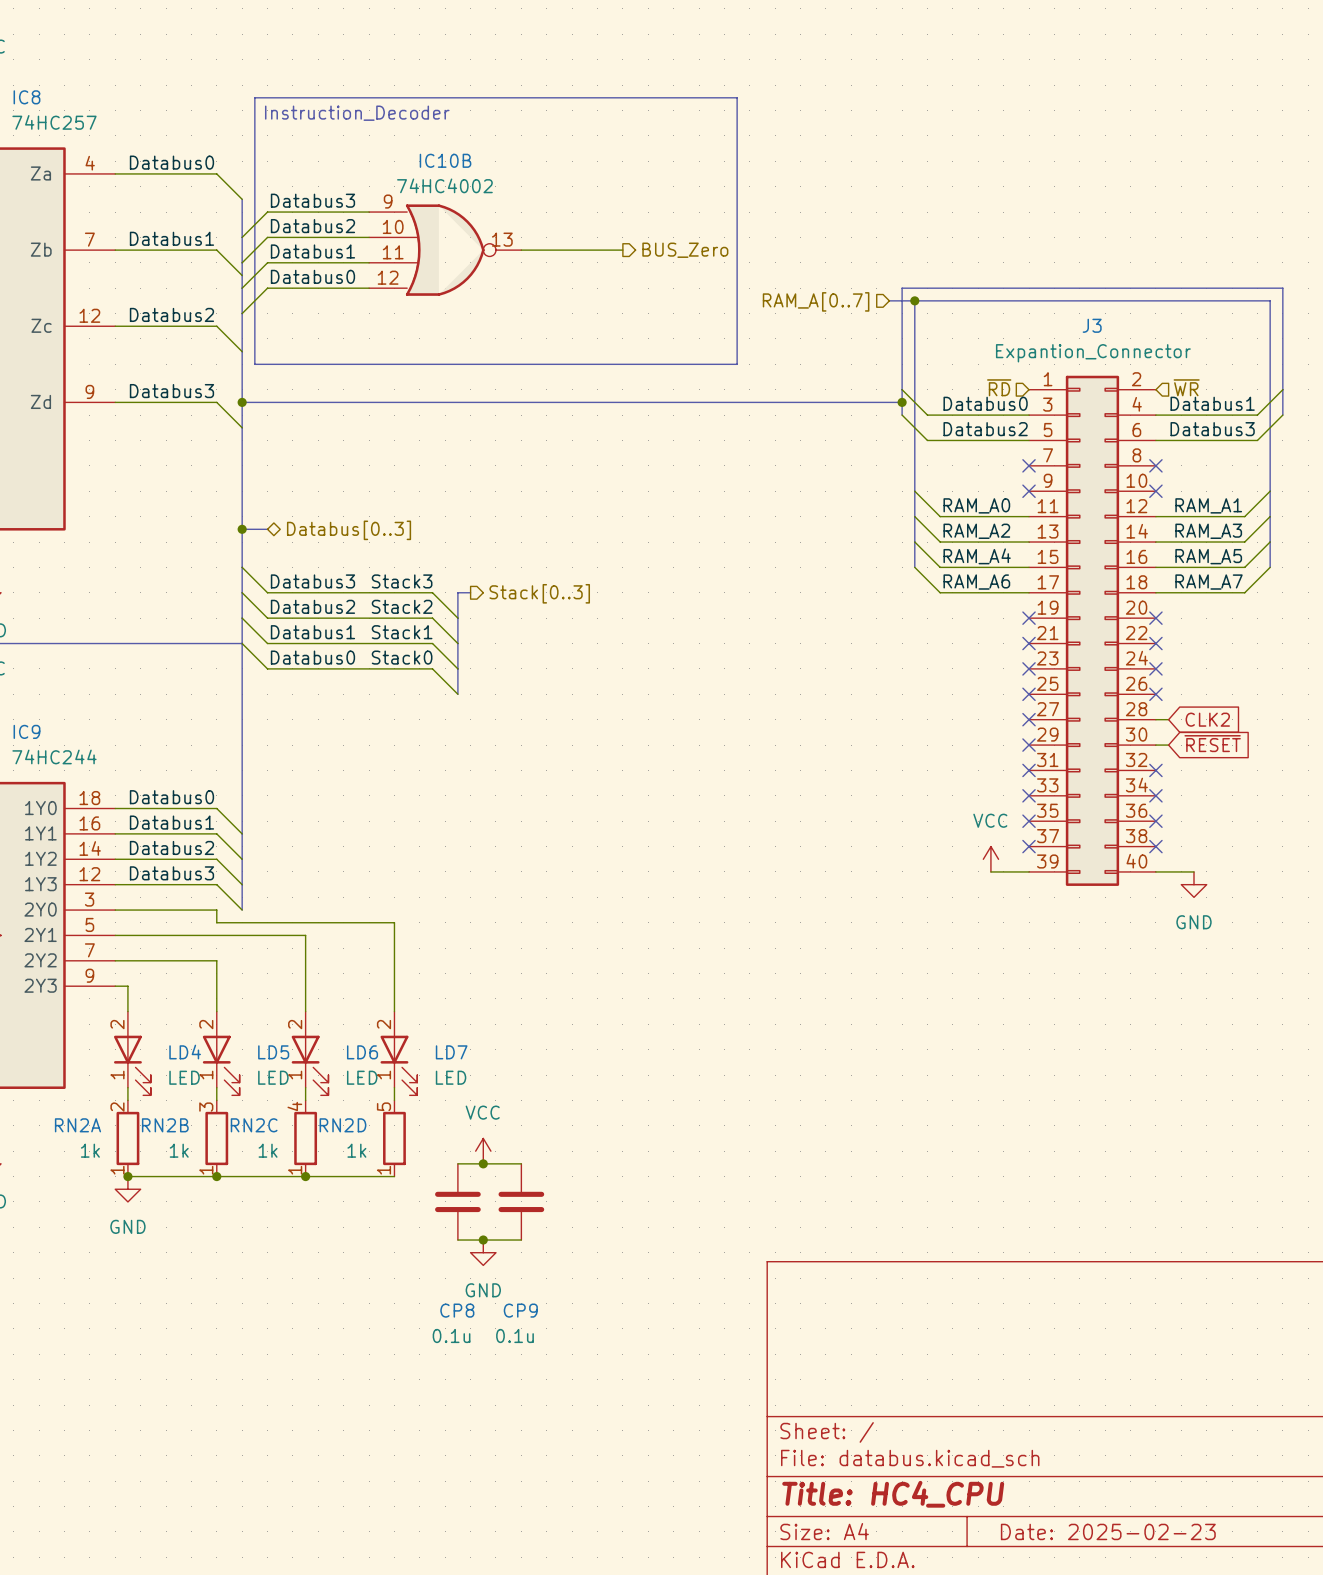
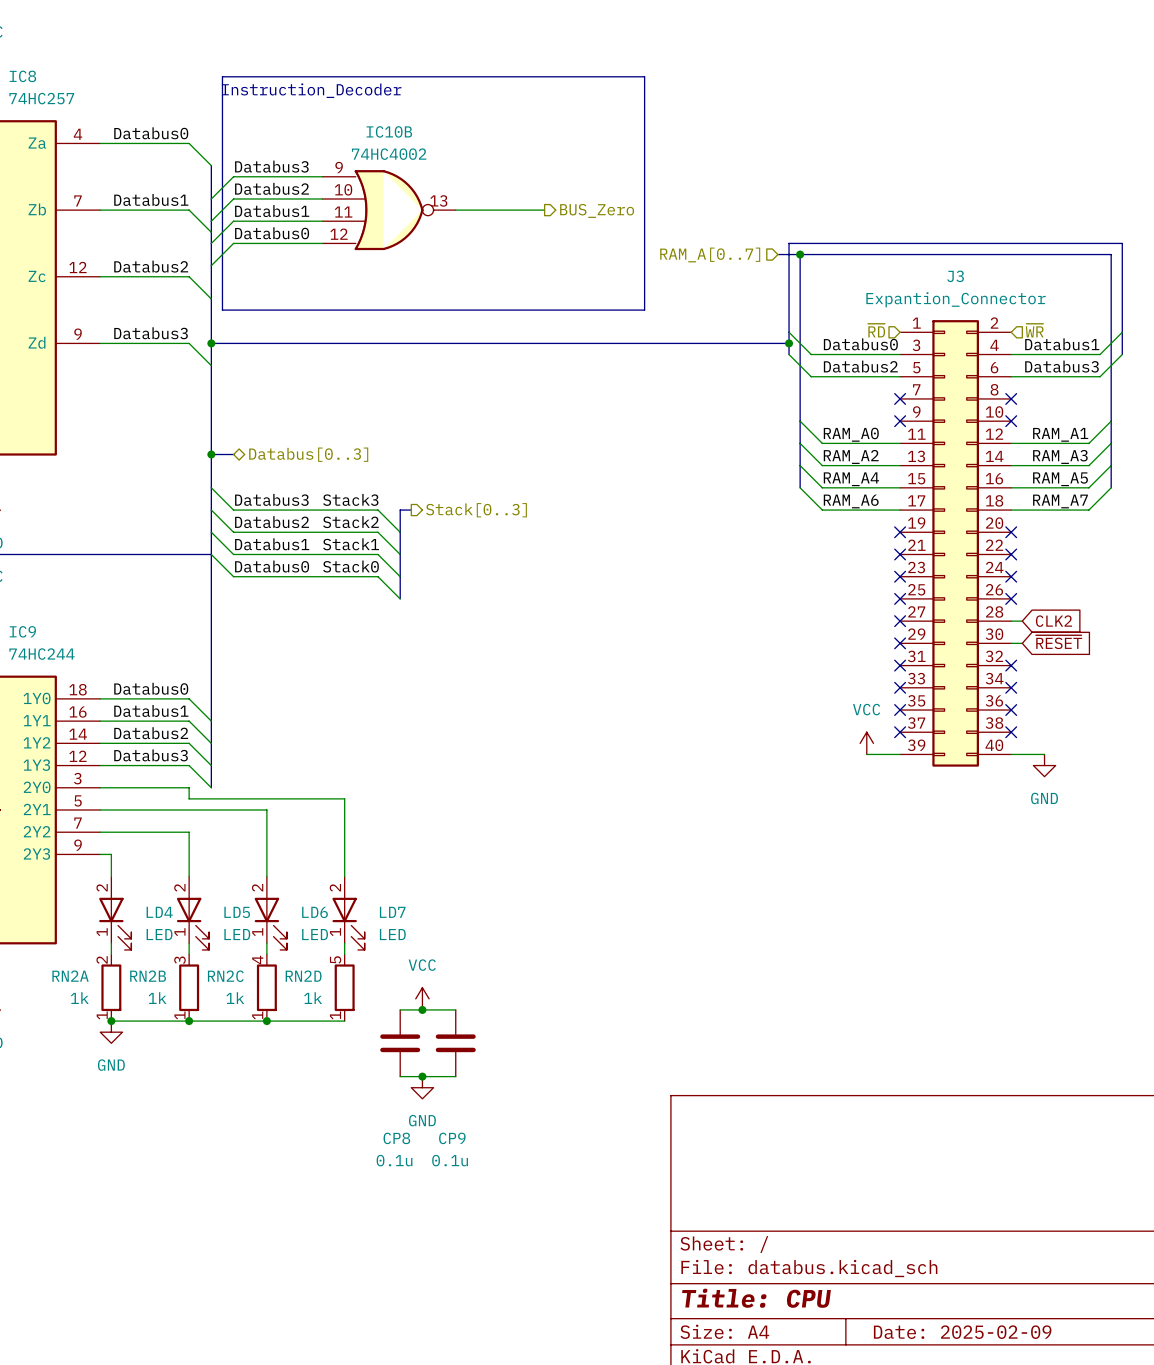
title block: Title: HC4_CPU (893, 1494) -> Title: CPU (756, 1298)
title block: Date: 2025-02-23 (1108, 1531) -> Date: 2025-02-09 (962, 1332)

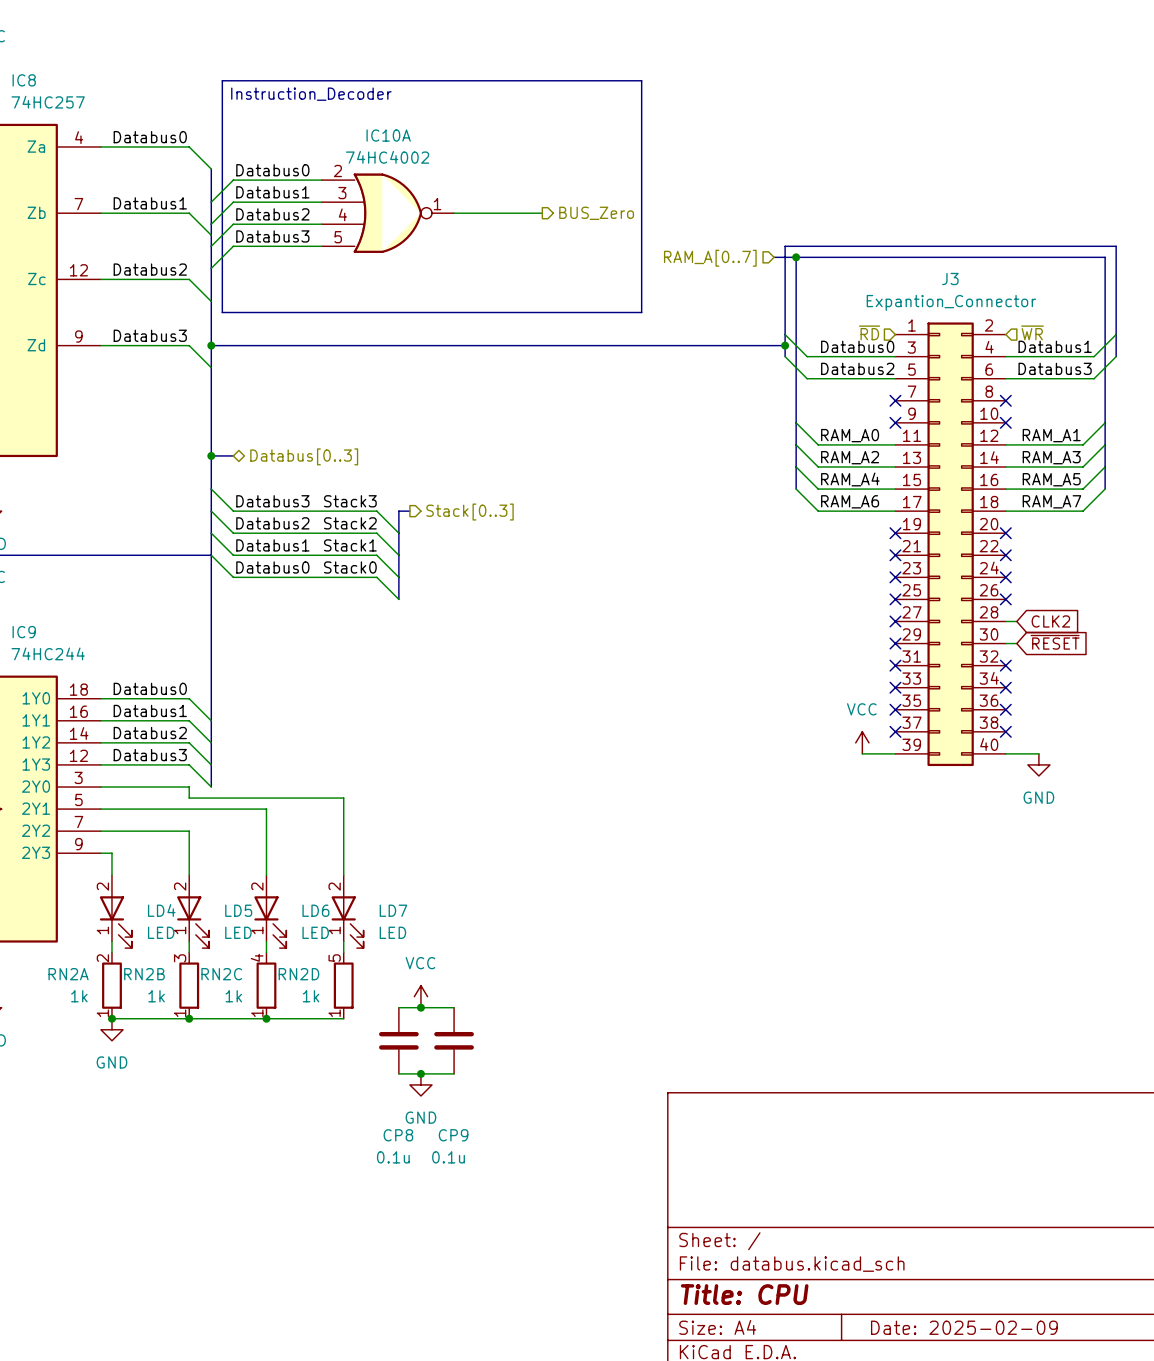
IC10B name: IC10B (389, 131) -> IC10A (388, 135)
label: Databus3 (271, 166) -> Databus0 (272, 170)
IC10B pin number: 9 (339, 167) -> 2 (337, 170)
label: Databus2 (272, 188) -> Databus1 (272, 192)
IC10B pin number: 10 (343, 189) -> 3 (342, 193)
IC10B pin number: 13 (438, 200) -> 1 (437, 204)
label: Databus1 (272, 211) -> Databus2 (272, 214)
IC10B pin number: 11 (343, 212) -> 4 (342, 214)
label: Databus0 (272, 233) -> Databus3 (272, 236)
IC10B pin number: 12 (339, 234) -> 5 (338, 237)

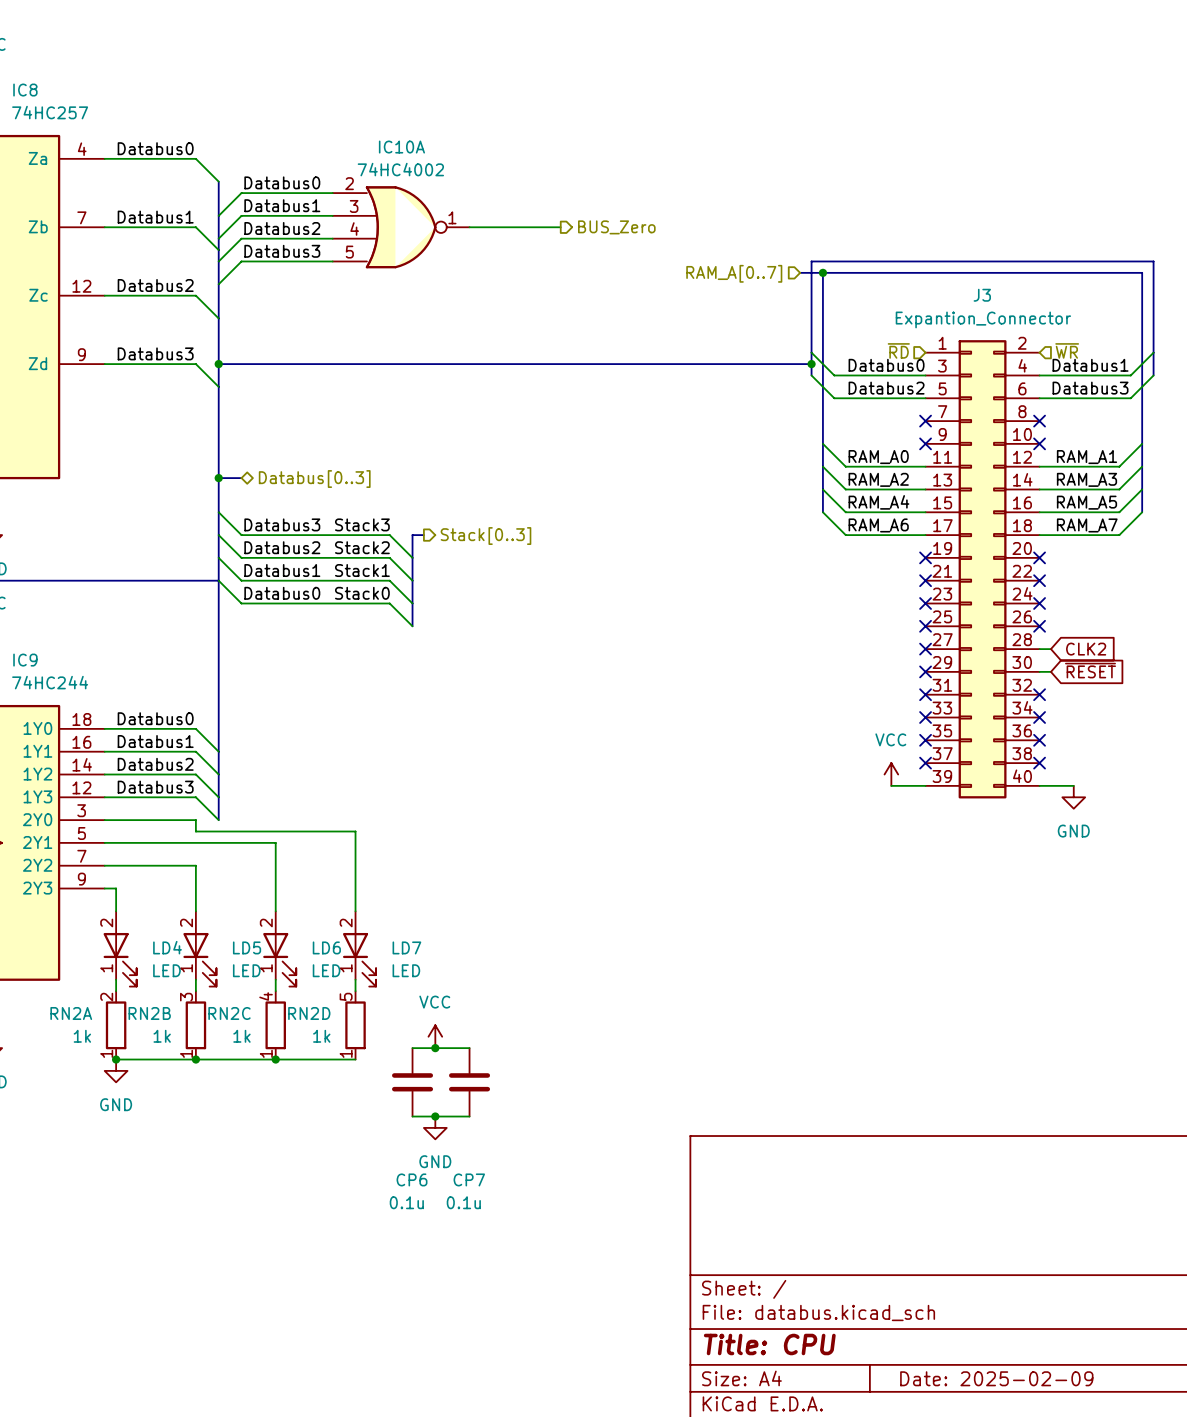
line: (222, 80) (641, 80) (641, 312) (222, 312) (222, 80) -> none
text: Instruction_Decoder (311, 94) -> none
CP8 name: CP8 (398, 1135) -> CP6 (412, 1179)
CP9 name: CP9 (453, 1135) -> CP7 (469, 1179)

